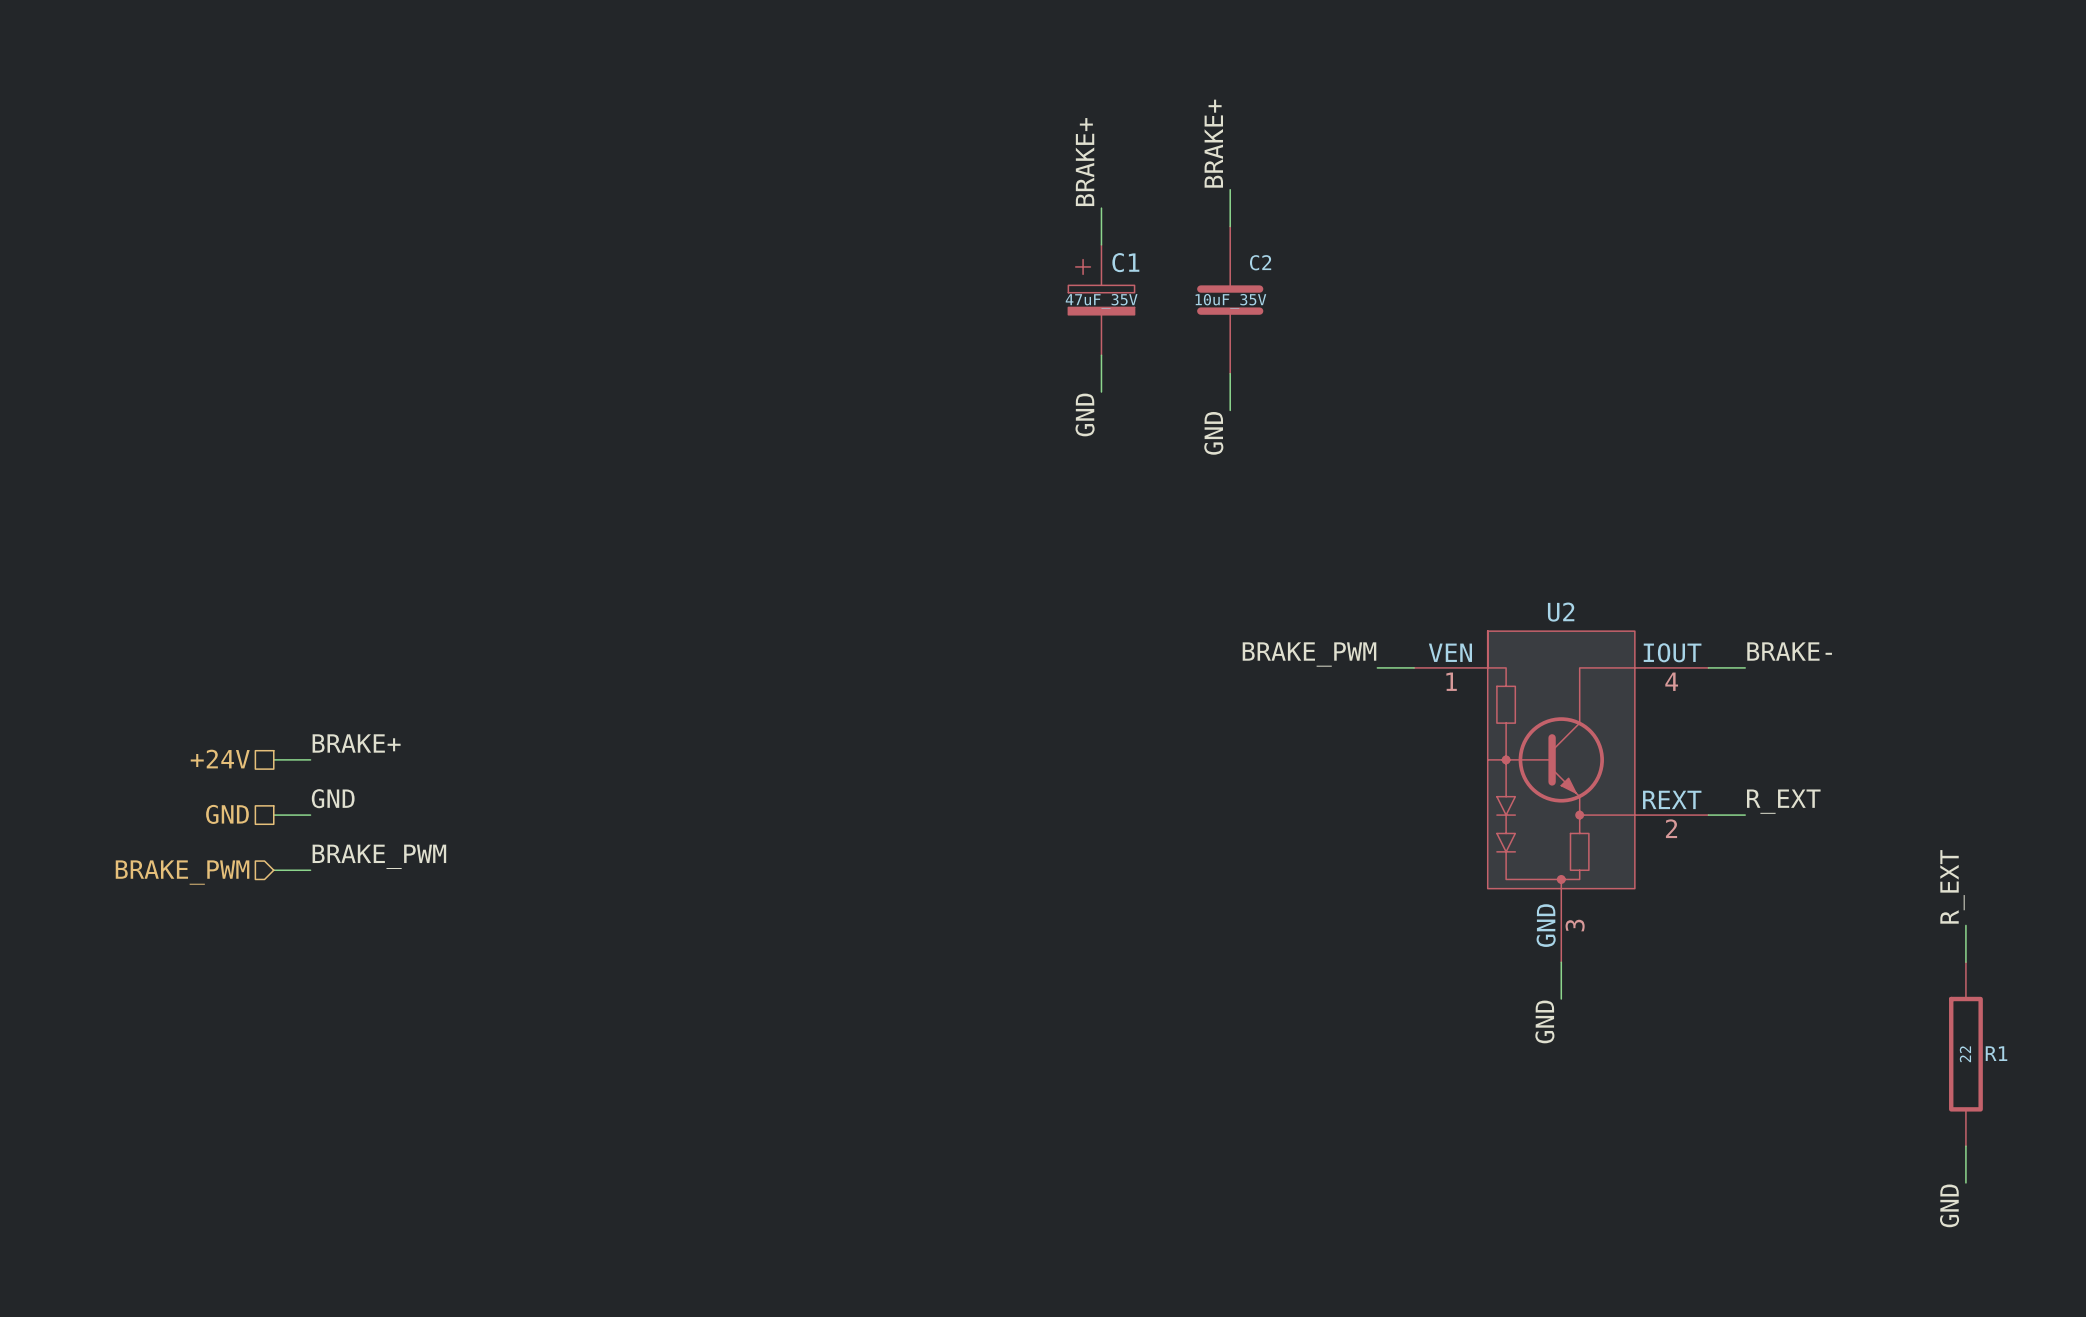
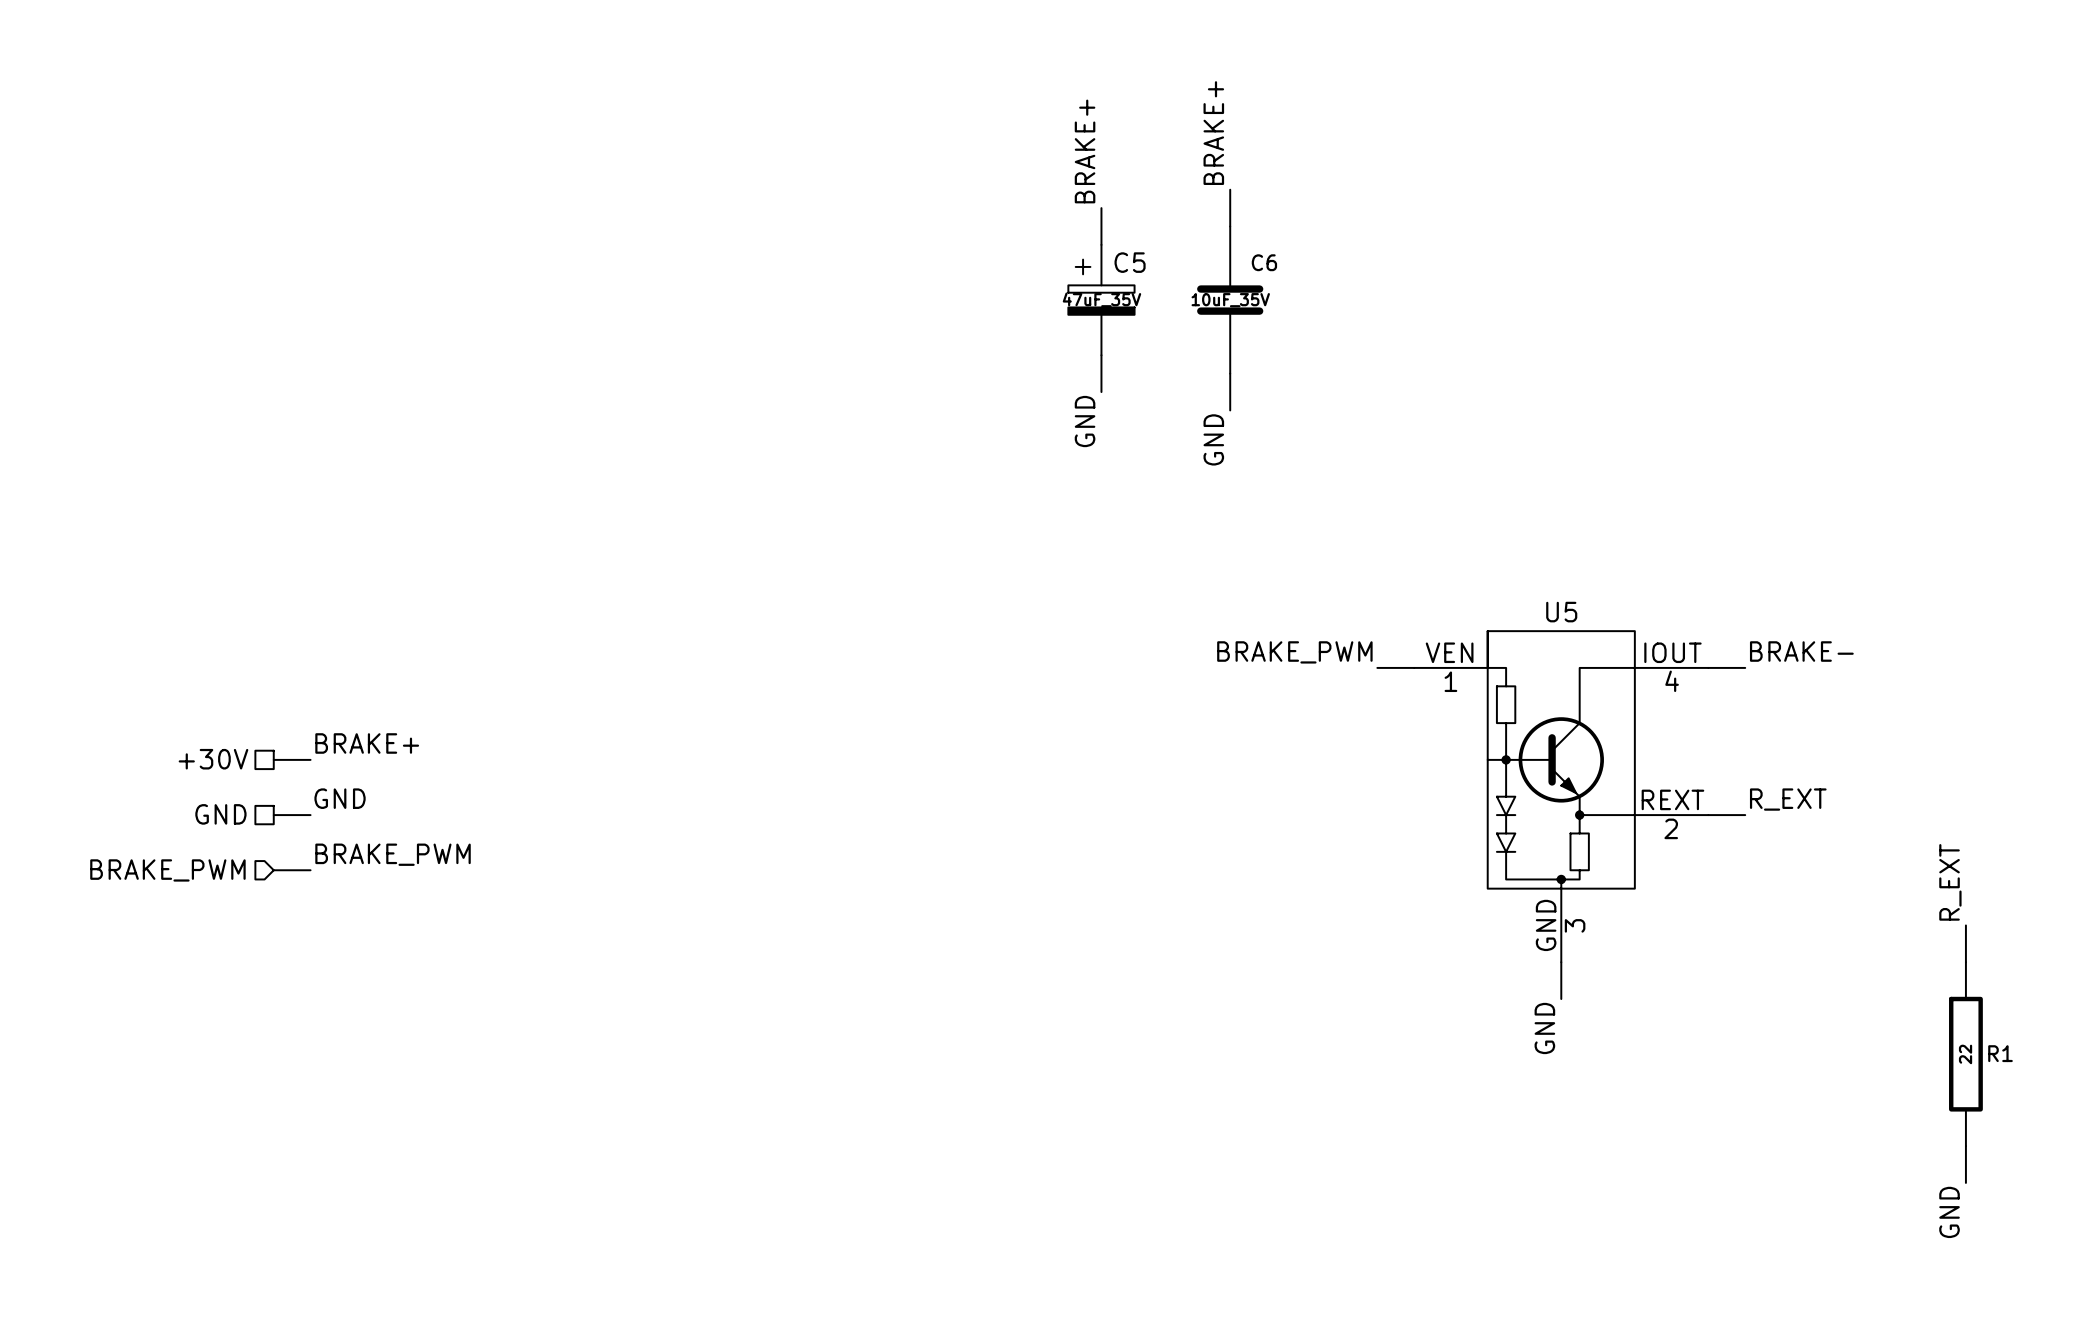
C1 name: C1 (1125, 262) -> C5 (1130, 262)
C2 name: C2 (1260, 262) -> C6 (1264, 262)
U2 name: U2 (1561, 612) -> U5 (1561, 612)
hierarchical label: +24V (220, 759) -> +30V (213, 759)

